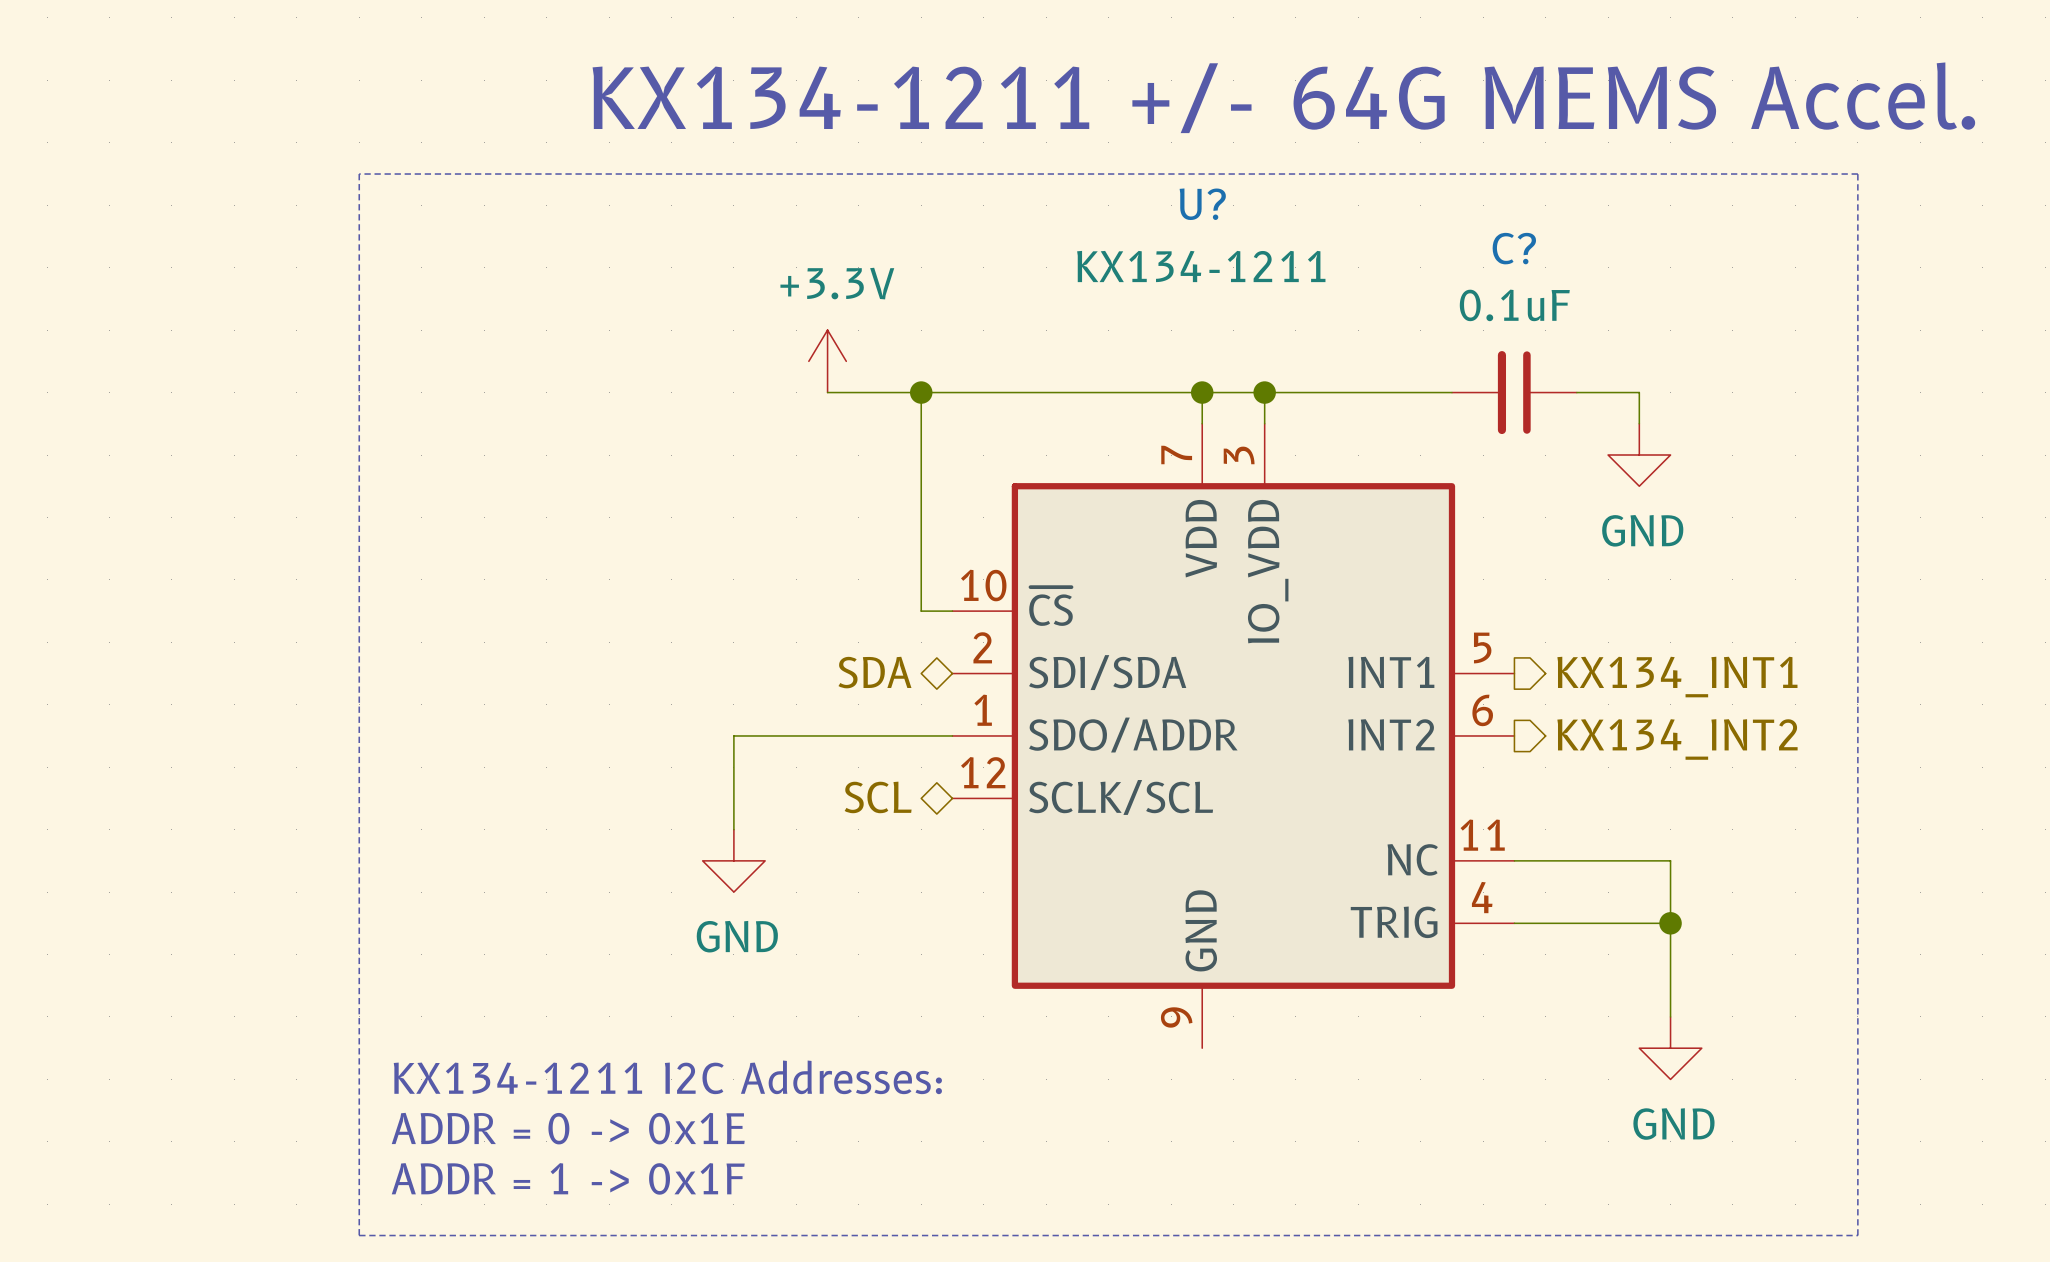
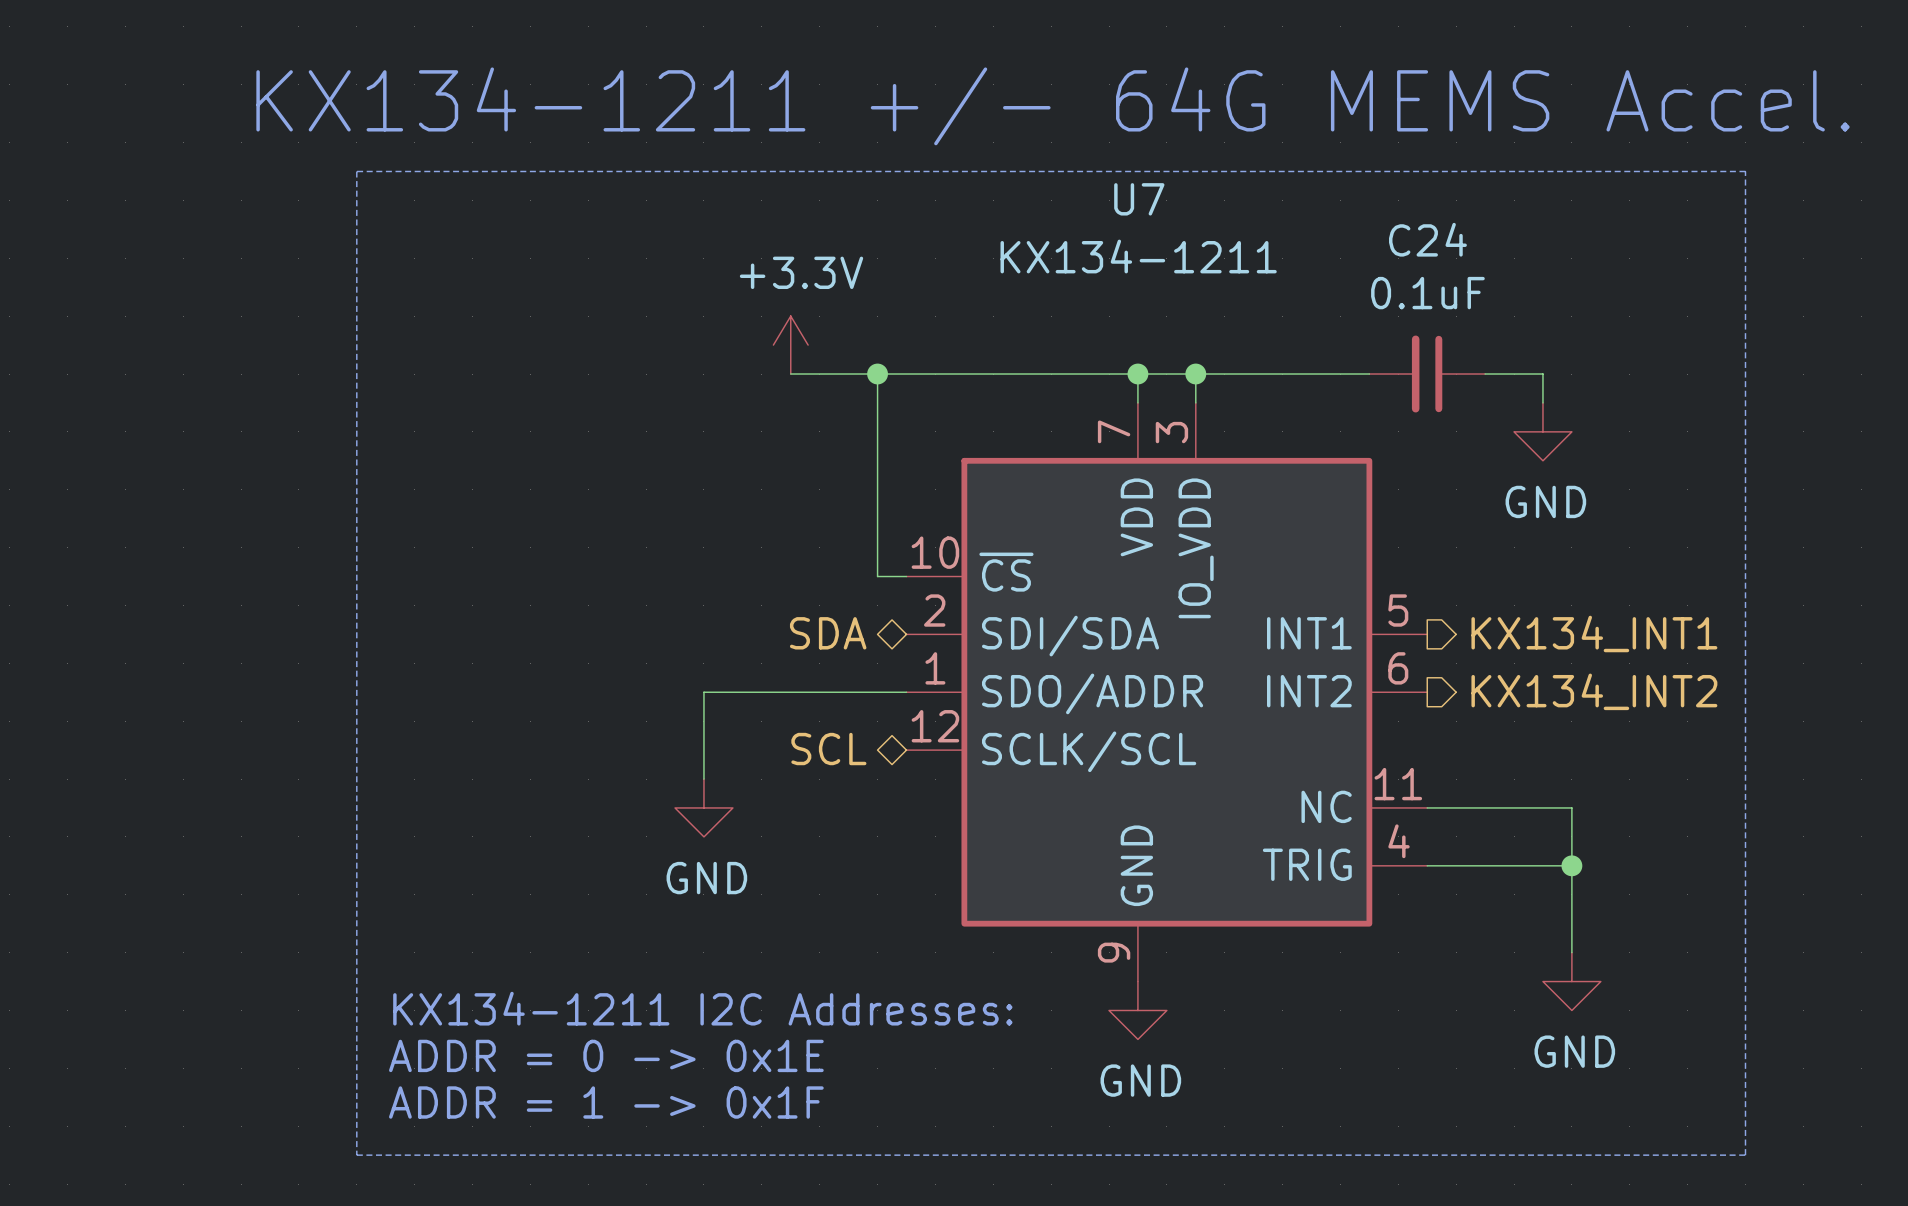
U? name: U? (1202, 204) -> U7 (1139, 199)
C? name: C? (1514, 248) -> C24 (1427, 239)
power symbol: none -> GND (1137, 1010)

